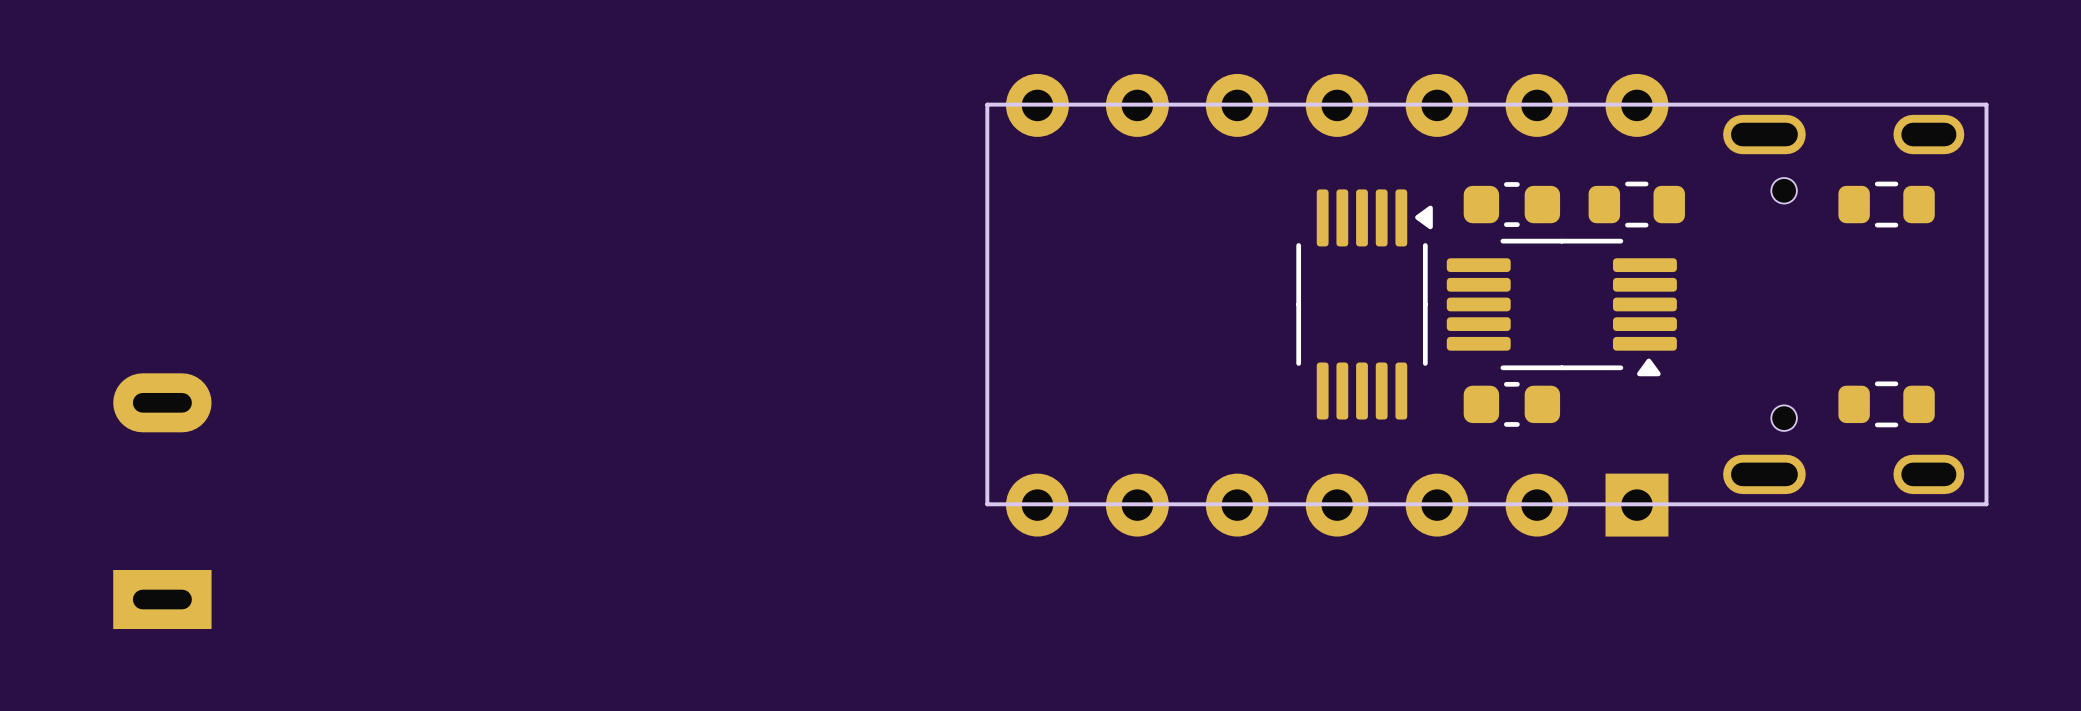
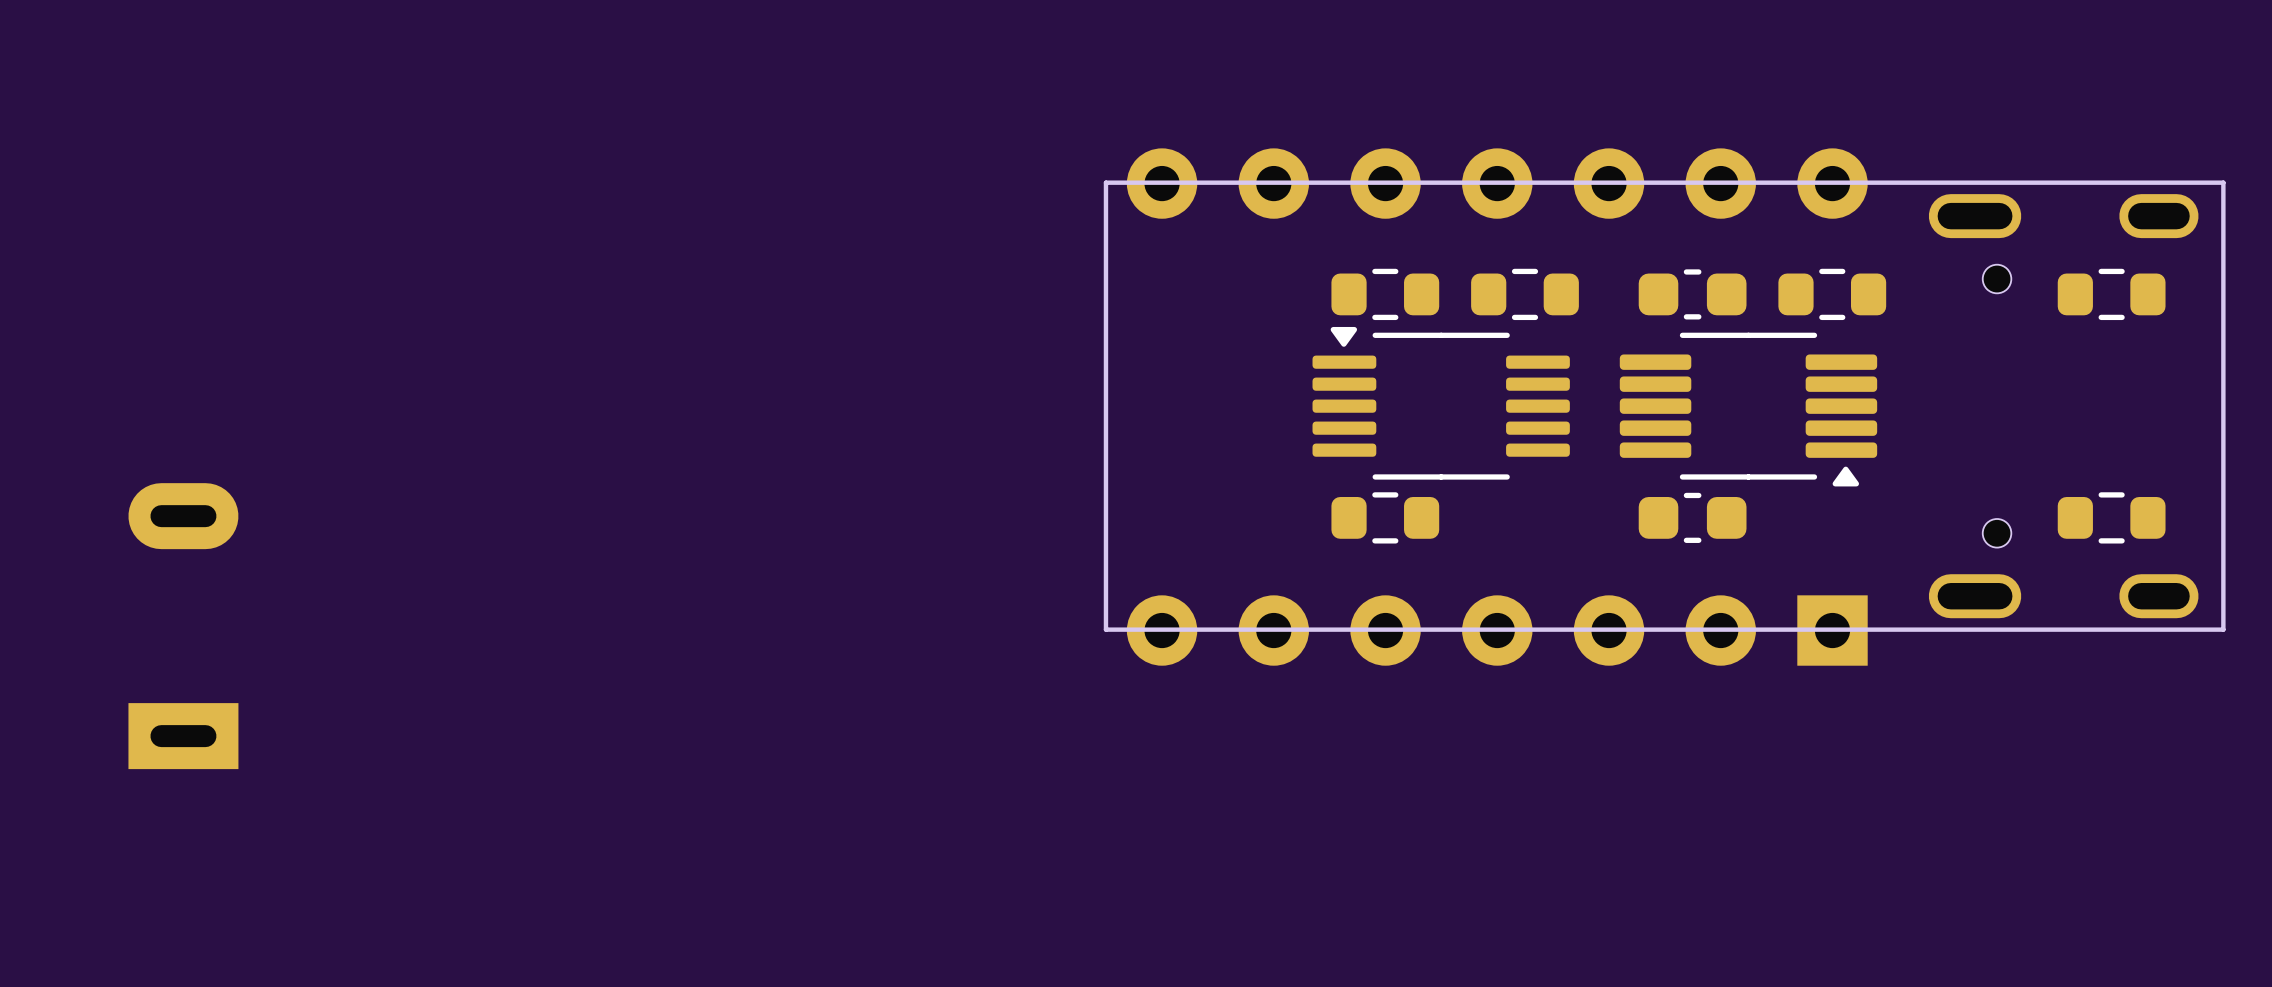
part: none -> (1385, 294)
part: none -> (1525, 294)
part rotation: 0° (1364, 304) -> 90° counterclockwise (1441, 403)
part: none -> (1385, 517)

